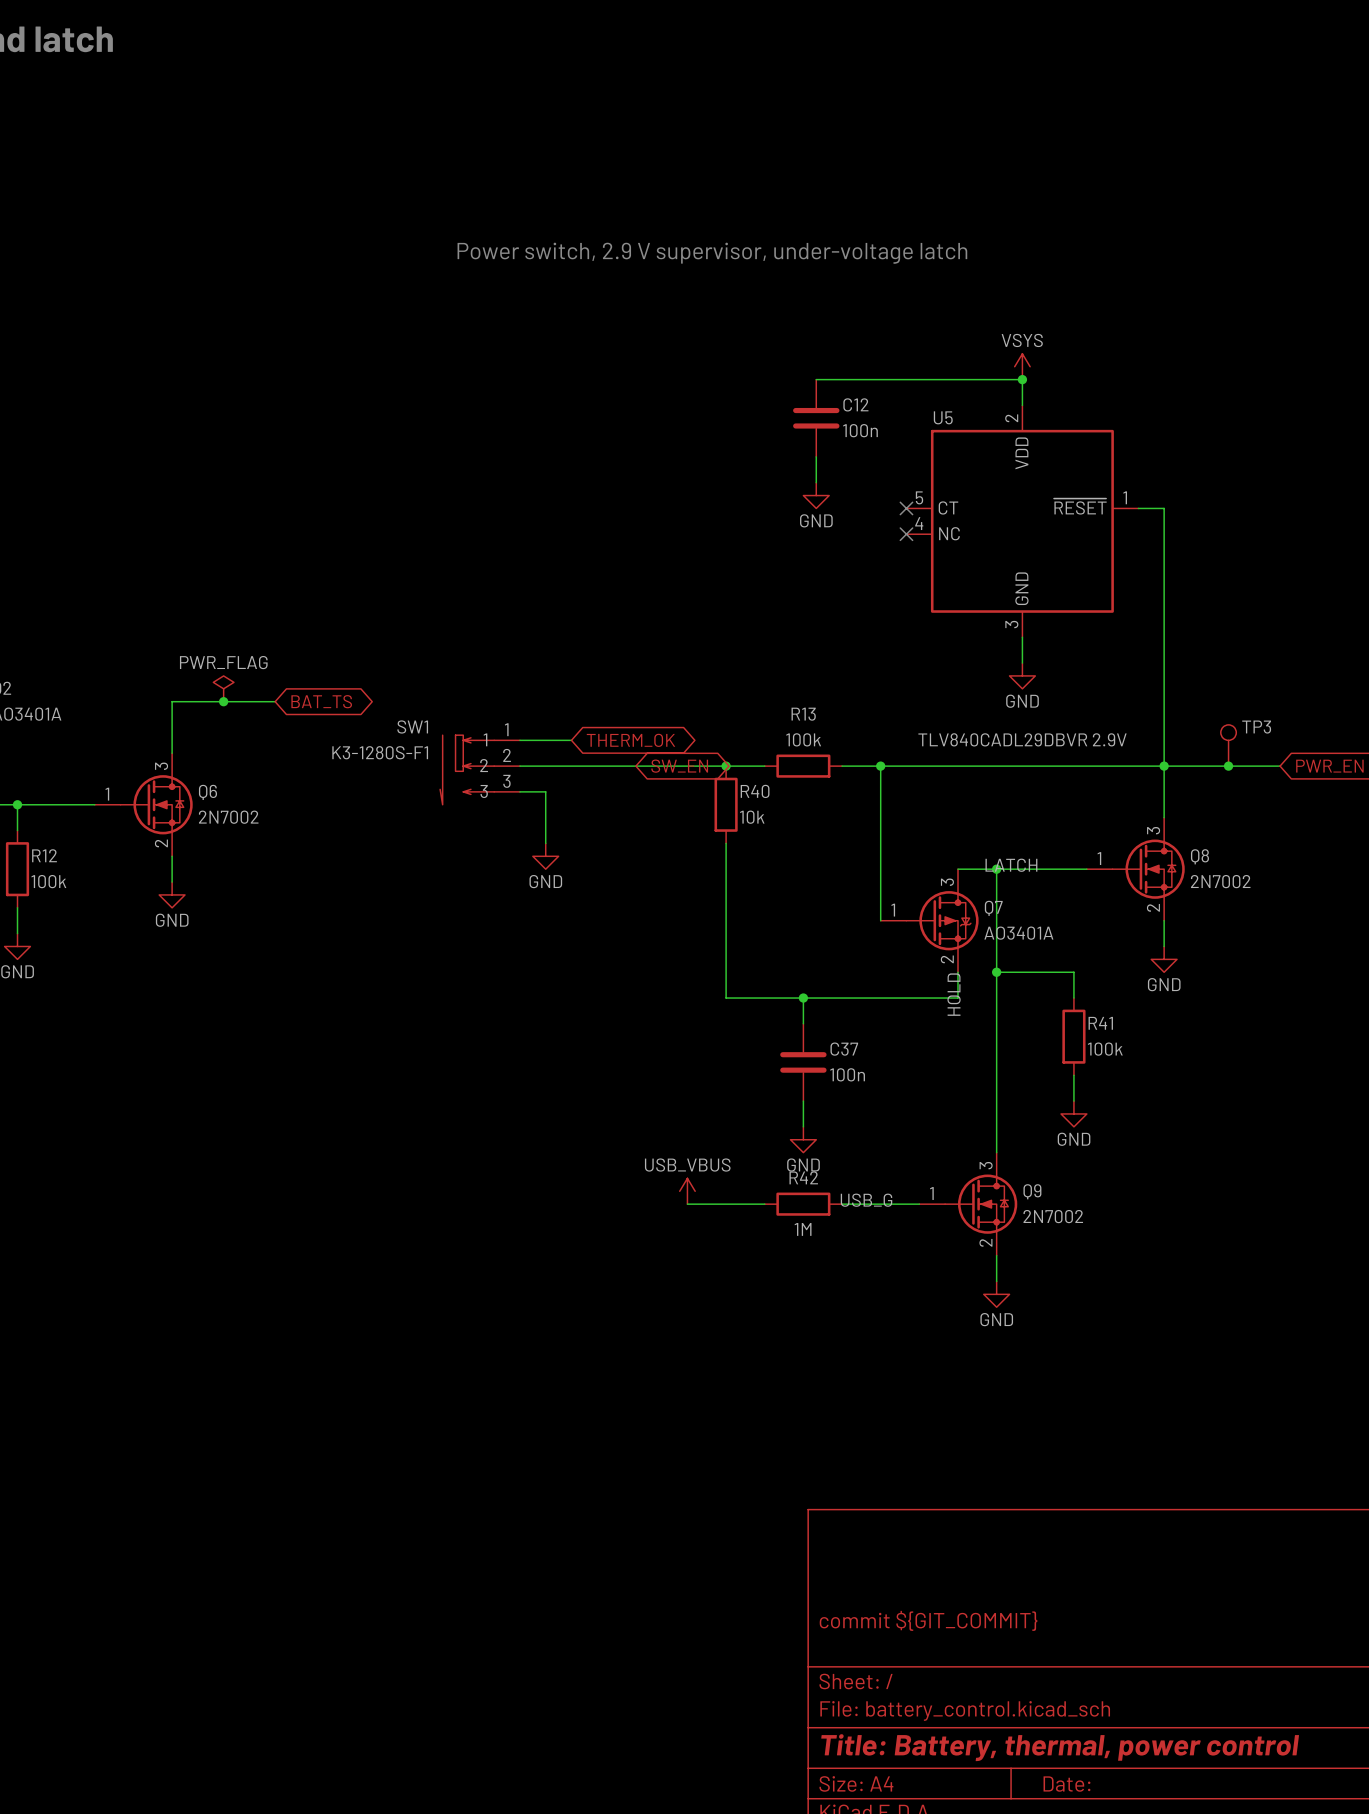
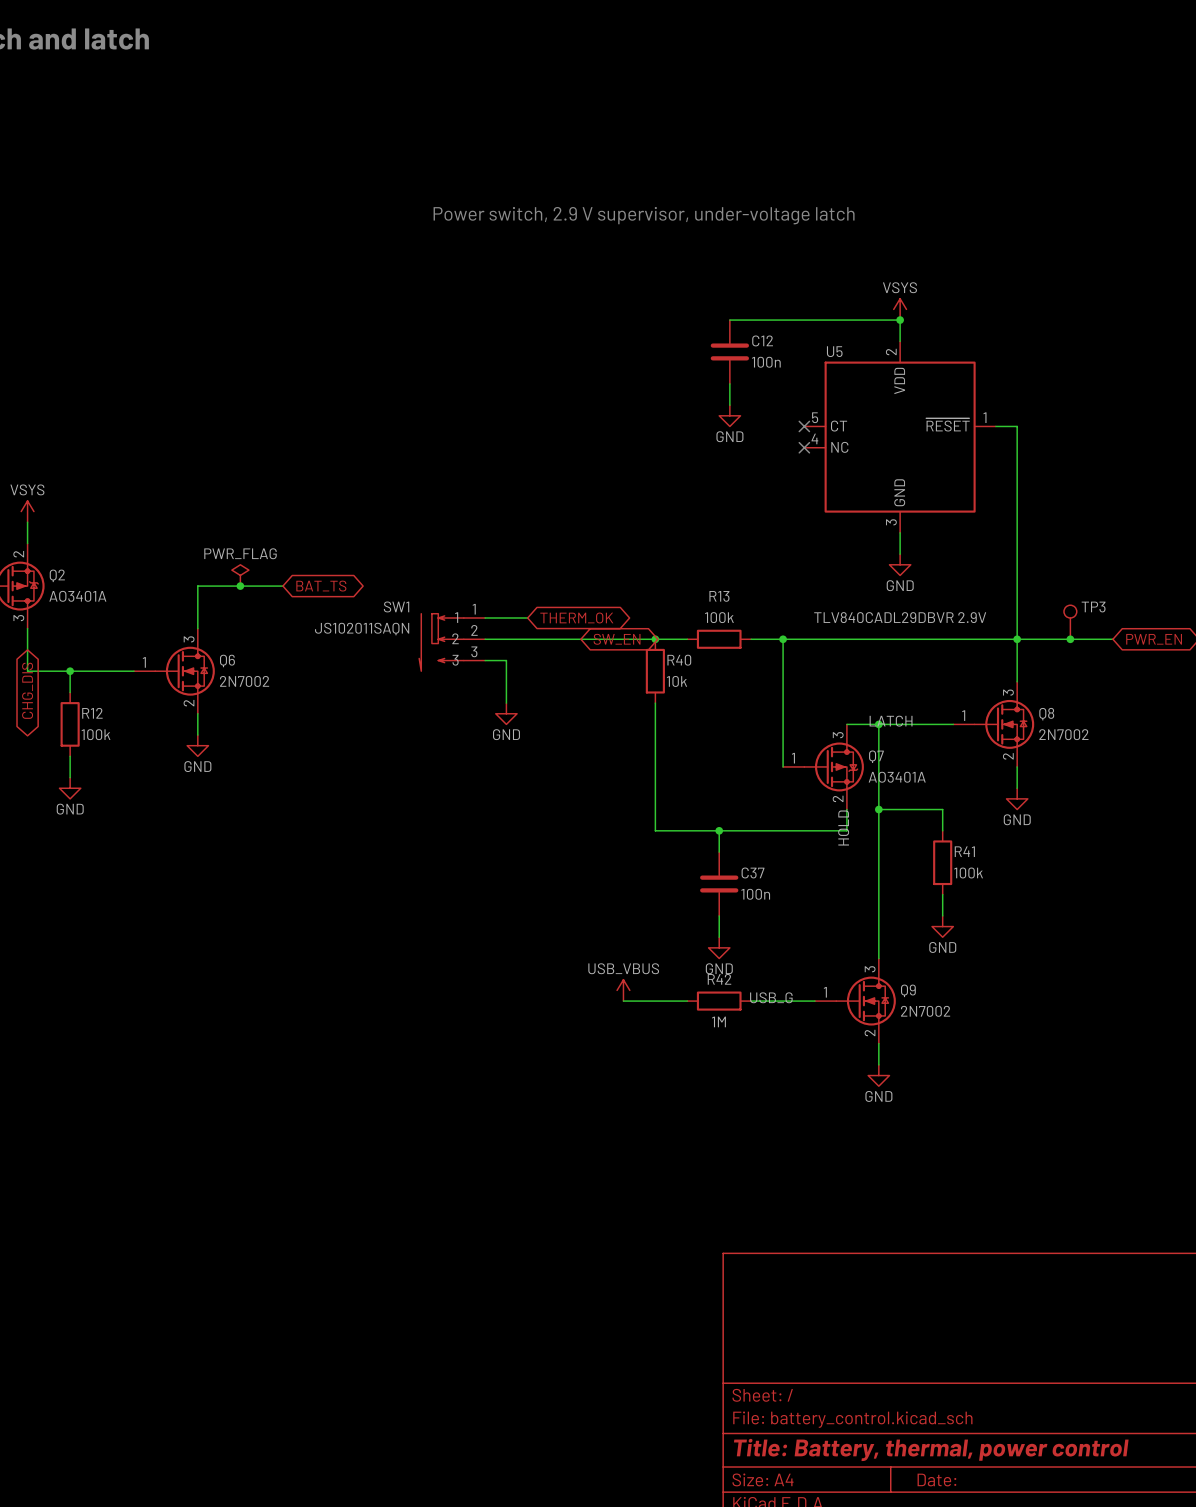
SW1 value: K3-1280S-F1 (380, 752) -> JS102011SAQN (362, 629)
title block: commit ${GIT_COMMIT} (928, 1620) -> none

